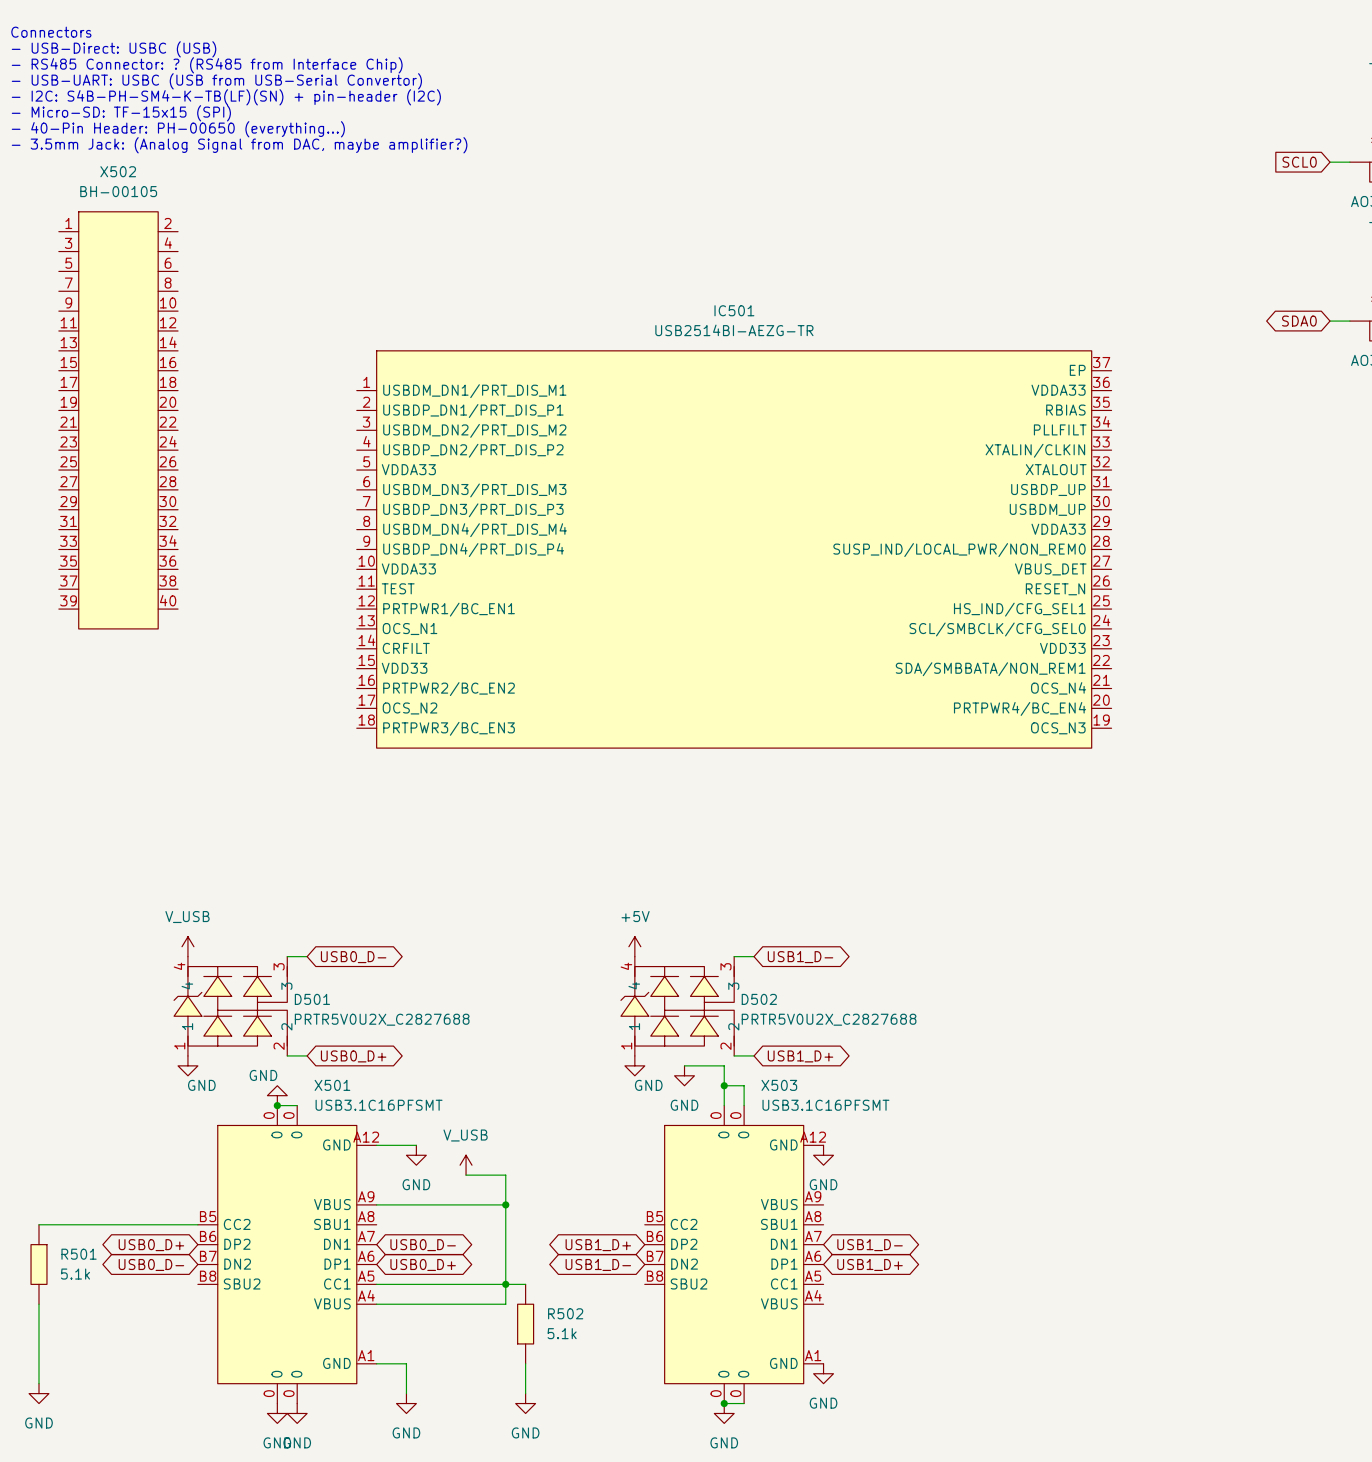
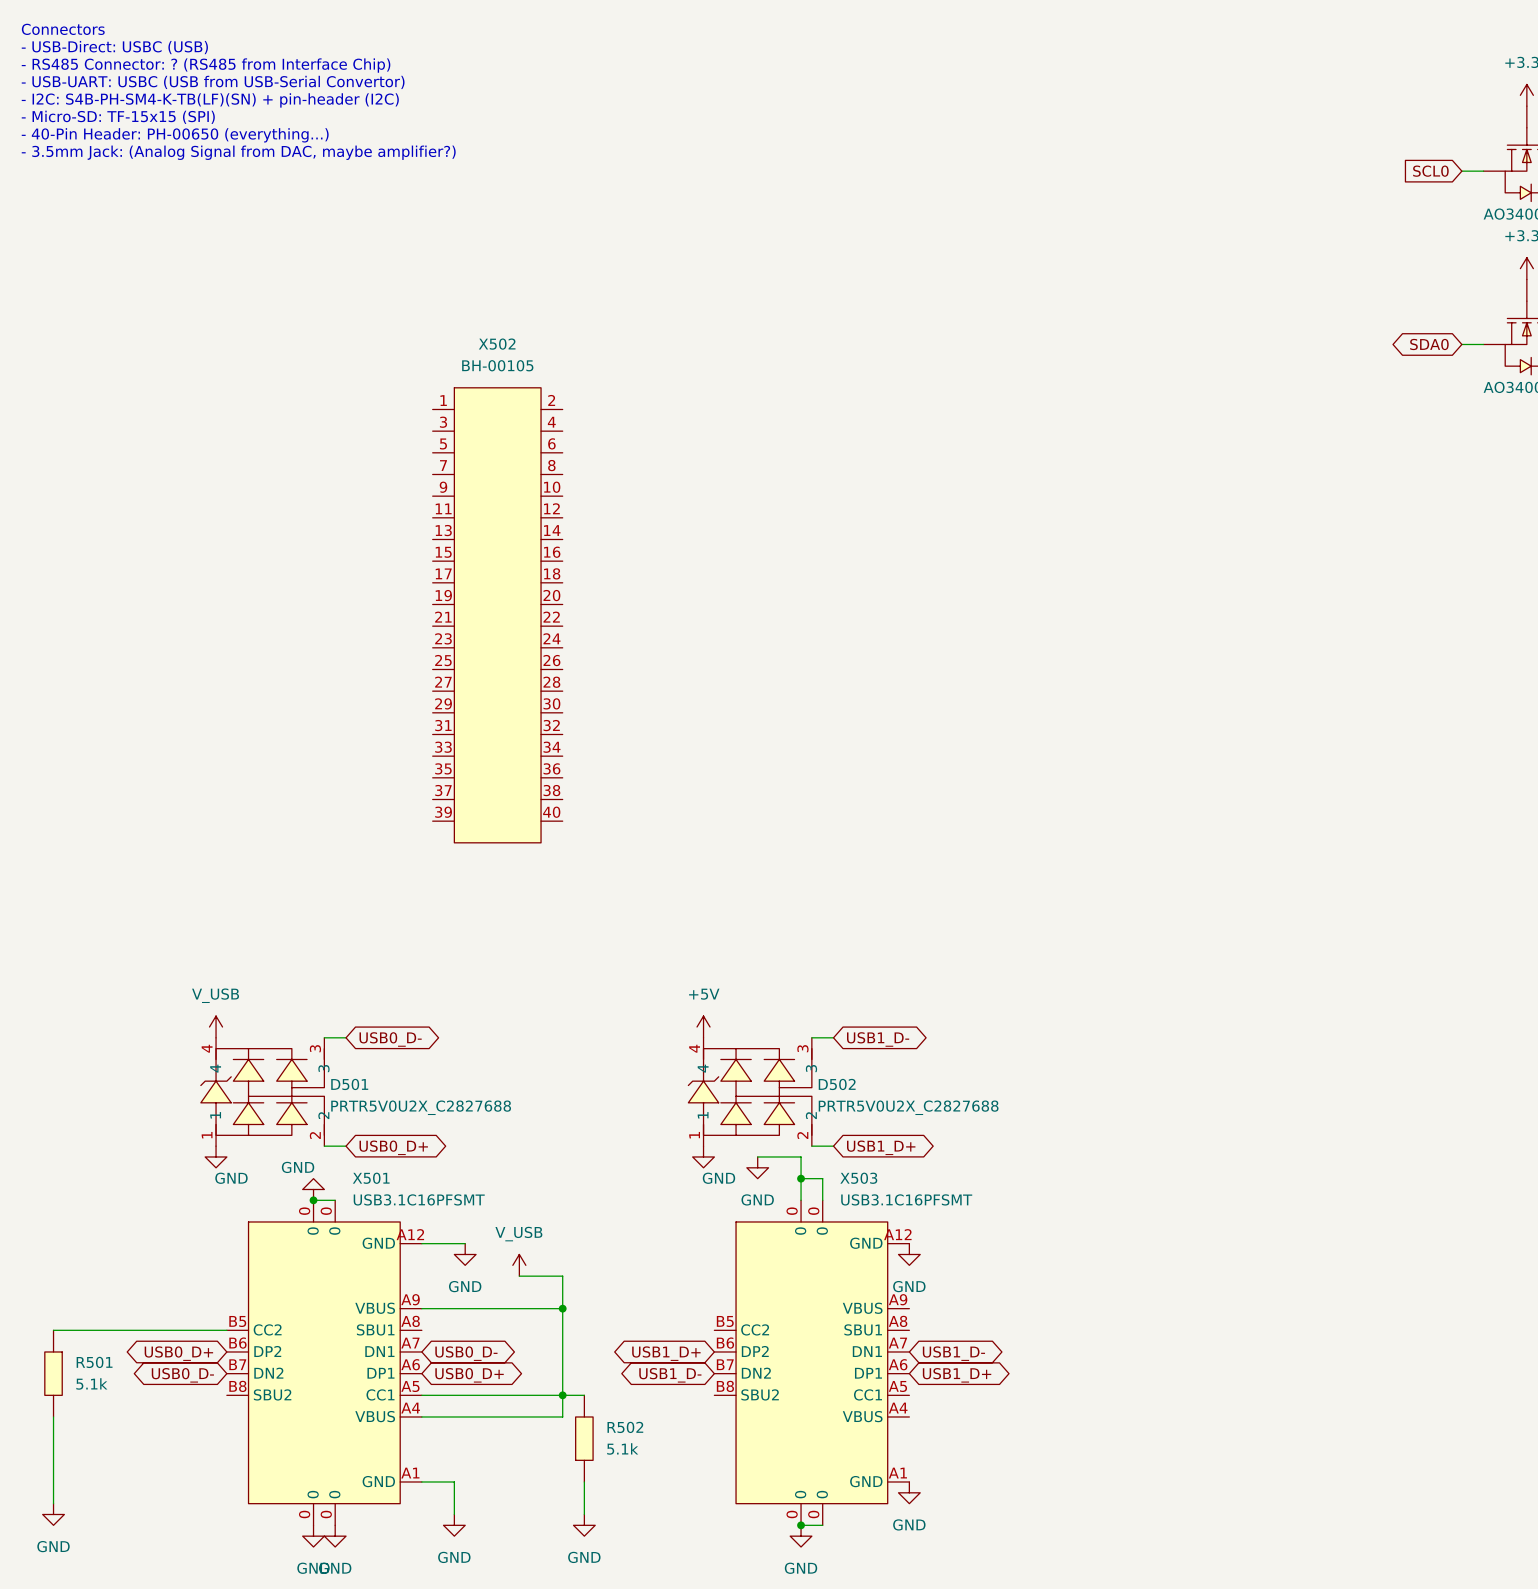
X502 position: (118, 420) -> (497, 615)
IC501: USB2514BI-AEZG-TR (734, 549) -> none

